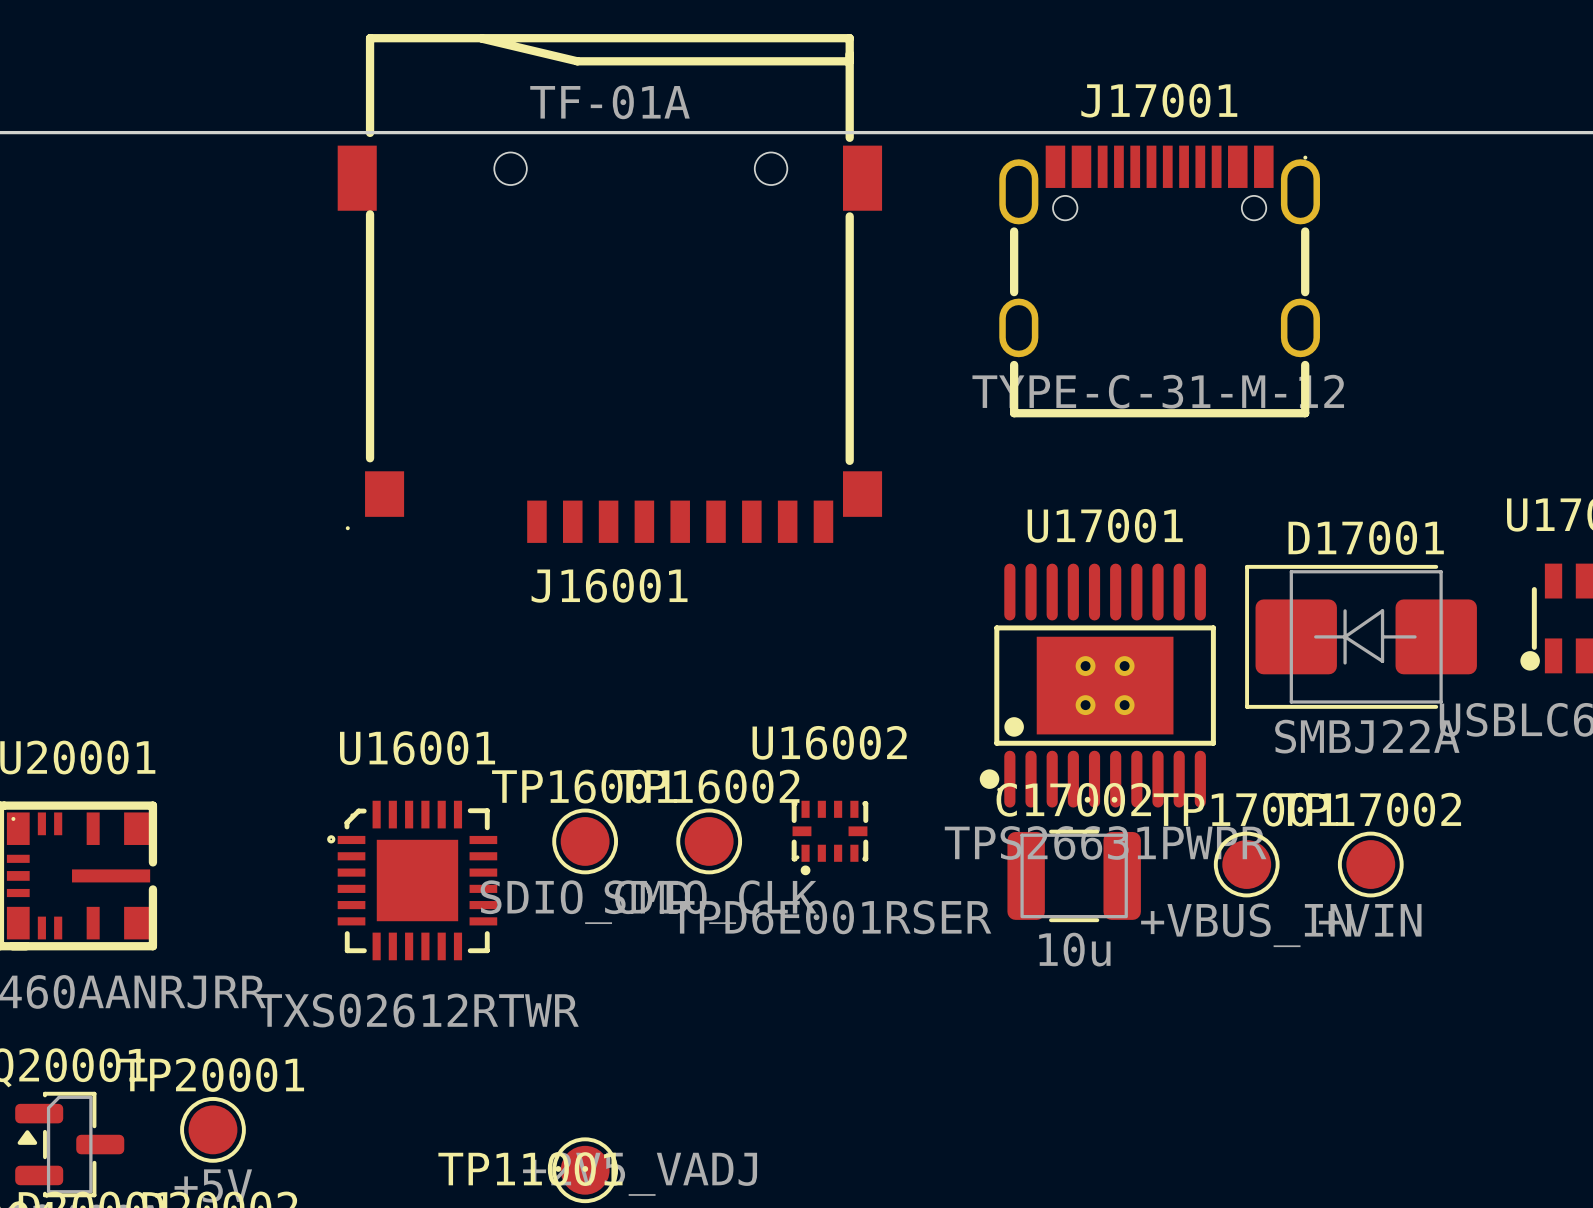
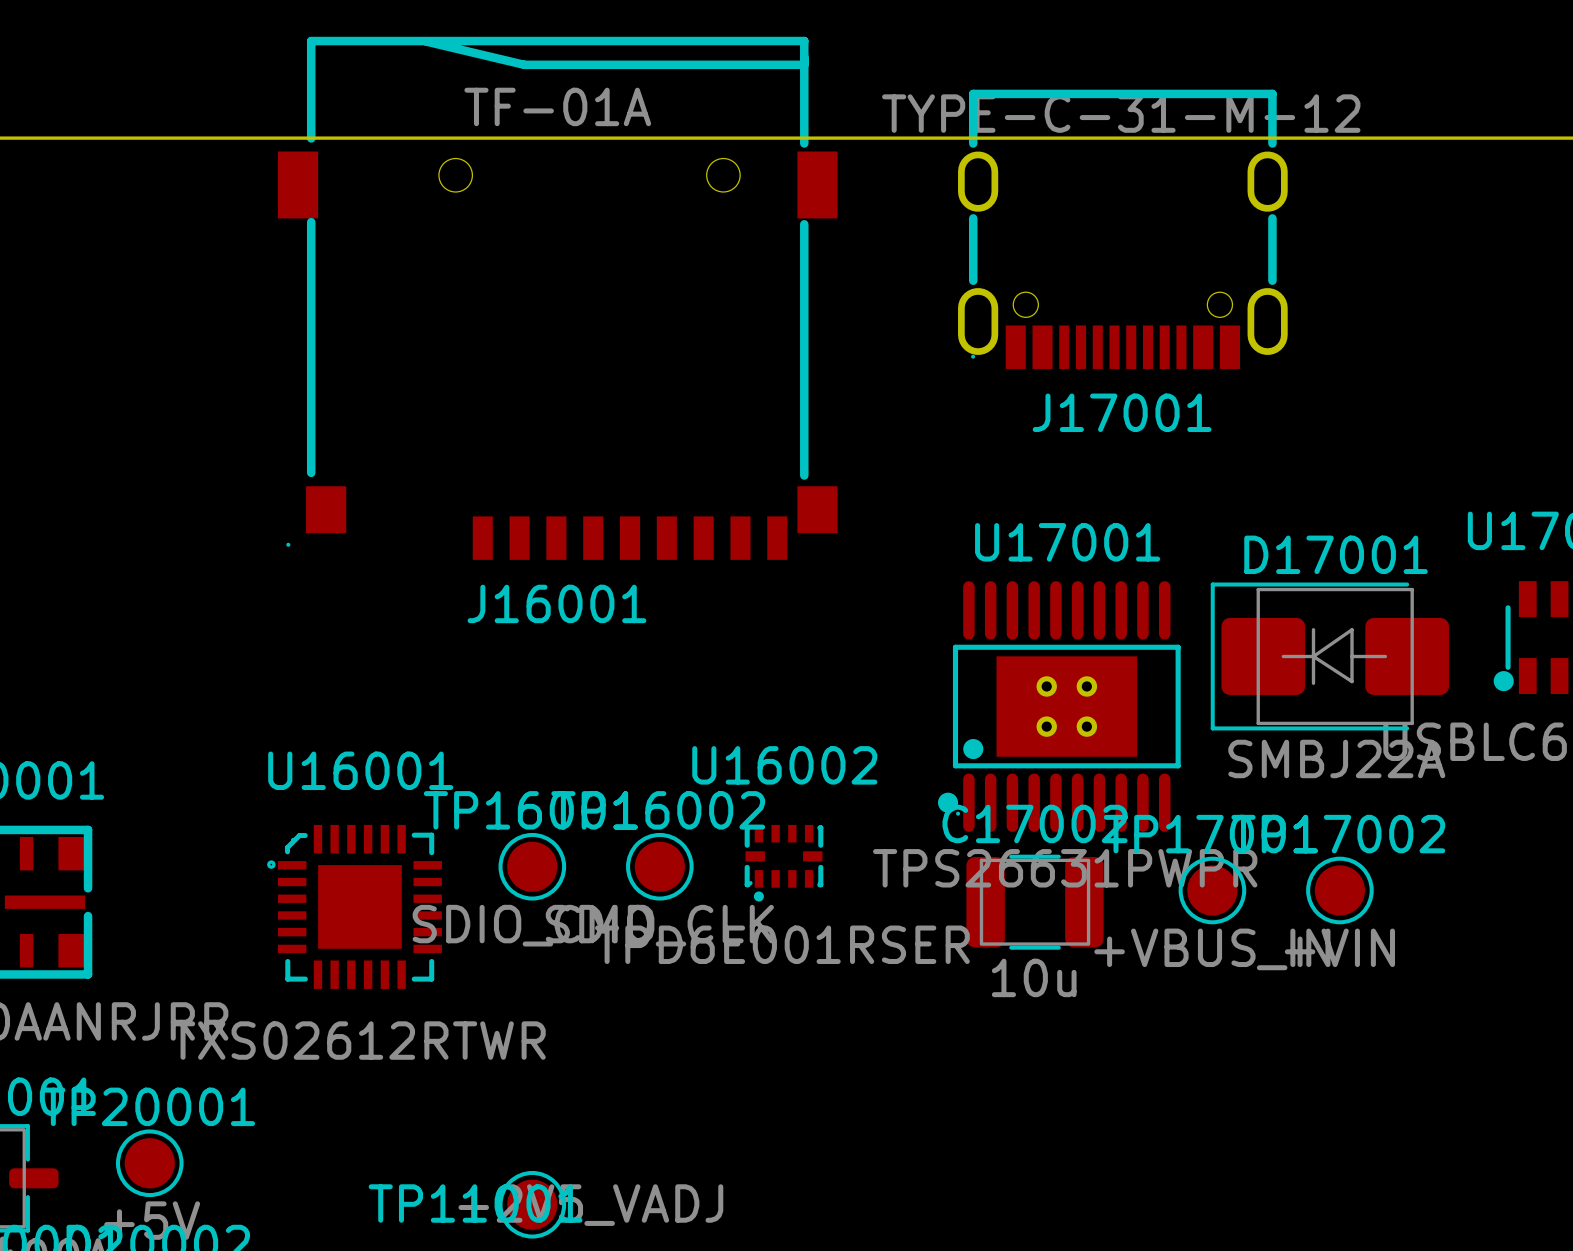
J17001 rotation: 0° (1159, 281) -> 180° (1122, 229)

